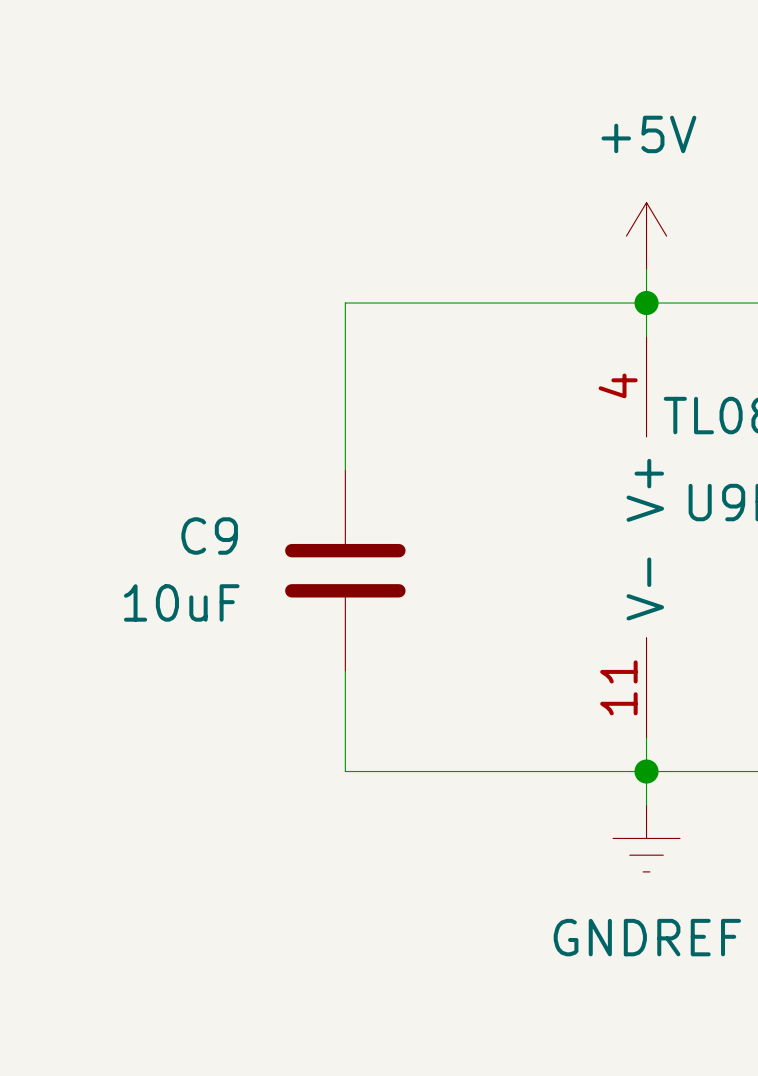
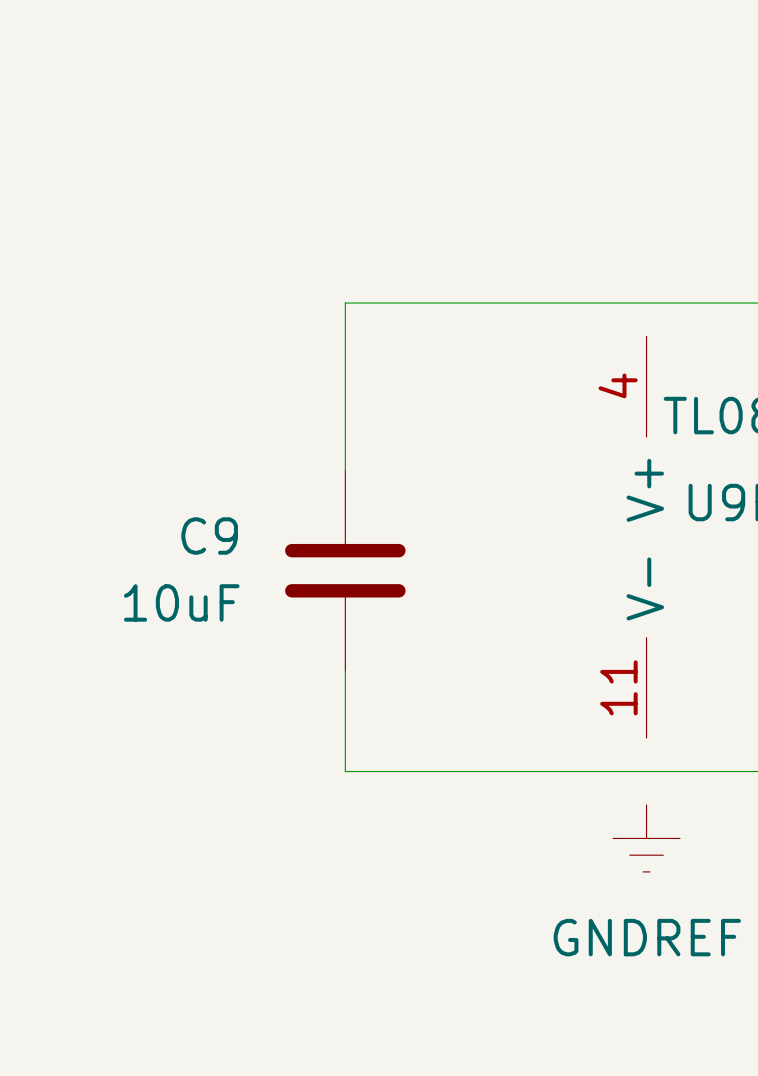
power symbol: +5V (646, 236) -> none
wire: (646, 269) (646, 336) -> none
junction: (646, 303) -> none
wire: (646, 738) (646, 804) -> none
junction: (646, 771) -> none

